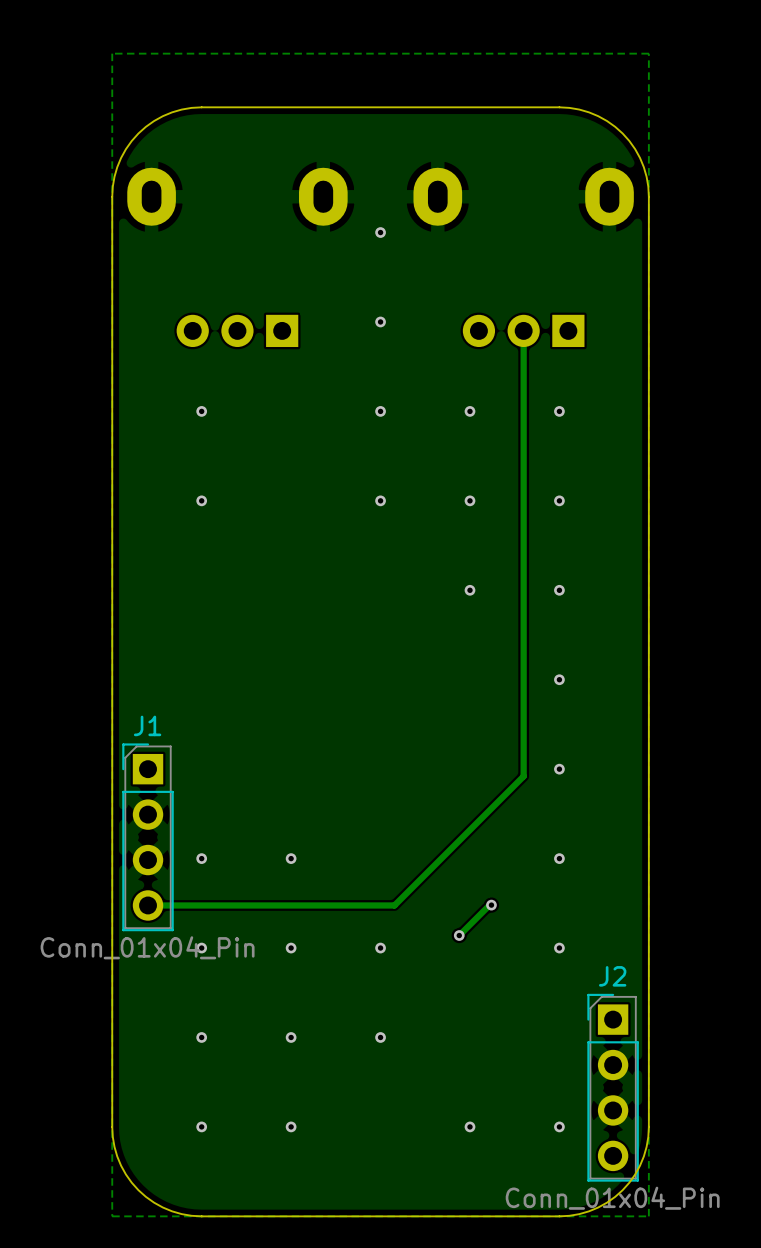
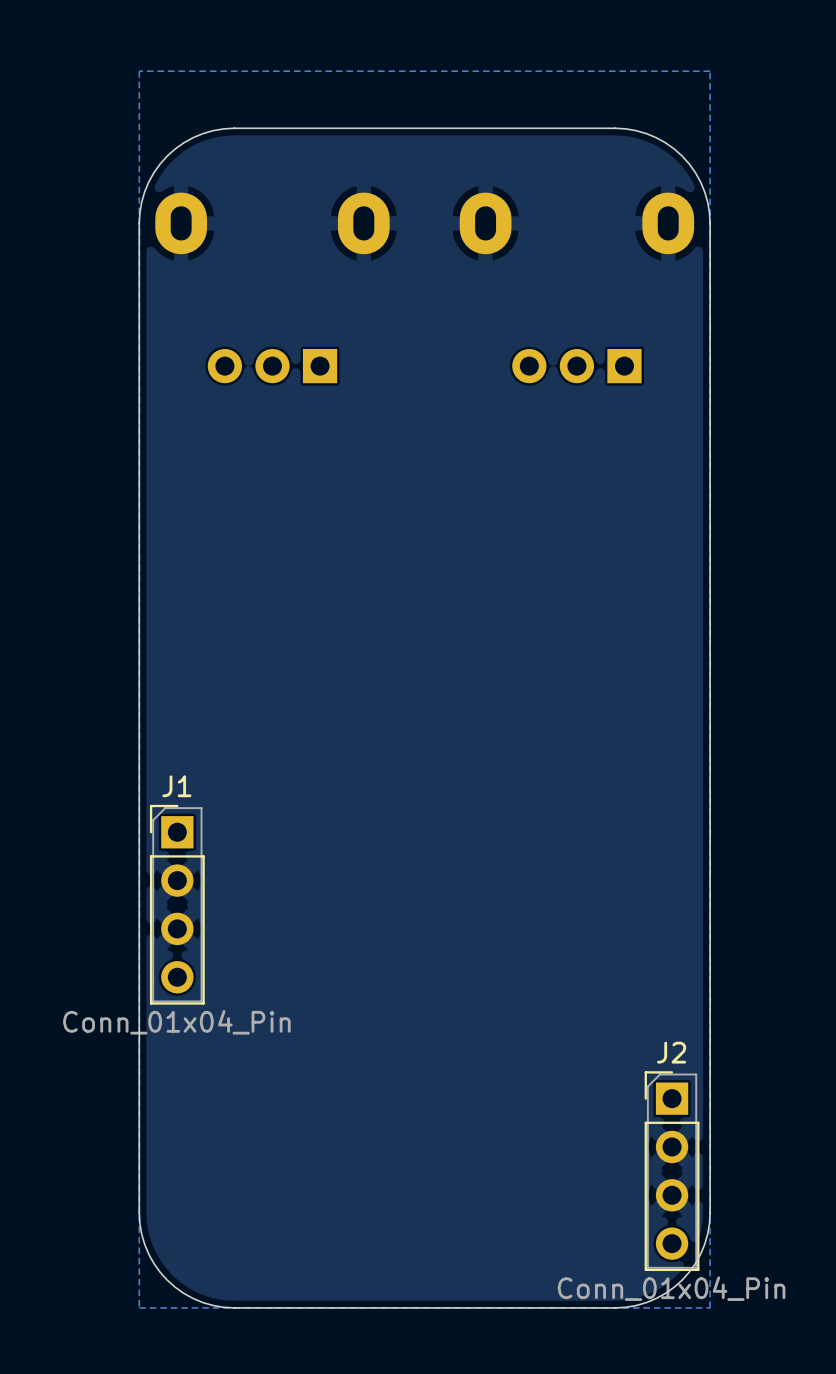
via: (380, 232) -> none
via: (380, 321) -> none
track: (523, 330) (523, 776) (394, 905) (148, 905) -> none
via: (201, 411) -> none
via: (380, 411) -> none
via: (469, 411) -> none
via: (559, 411) -> none
via: (201, 500) -> none
via: (380, 500) -> none
via: (469, 500) -> none
via: (559, 500) -> none
via: (469, 590) -> none
via: (559, 590) -> none
via: (559, 679) -> none
via: (559, 769) -> none
via: (201, 858) -> none
via: (291, 858) -> none
via: (559, 858) -> none
track: (491, 905) (459, 935) -> none
via: (491, 905) -> none
via: (459, 935) -> none
via: (201, 948) -> none
via: (291, 948) -> none
via: (380, 948) -> none
via: (559, 948) -> none
via: (201, 1037) -> none
via: (291, 1037) -> none
via: (380, 1037) -> none
via: (201, 1126) -> none
via: (291, 1126) -> none
via: (469, 1126) -> none
via: (559, 1126) -> none

